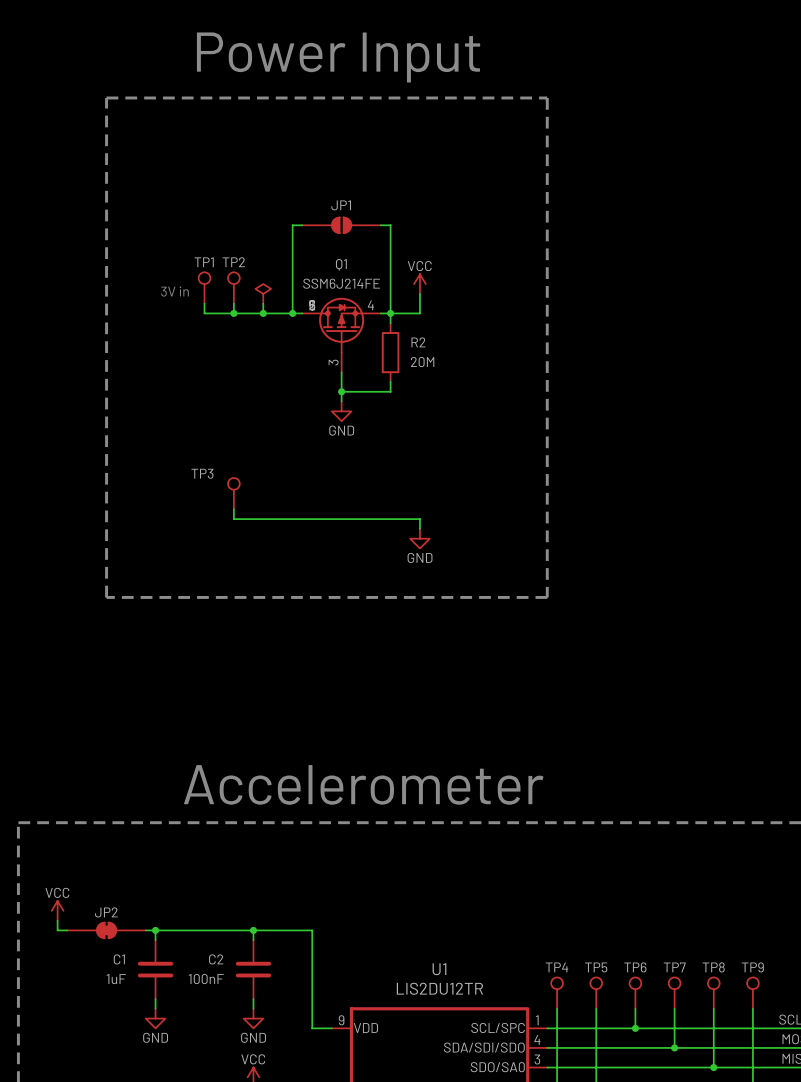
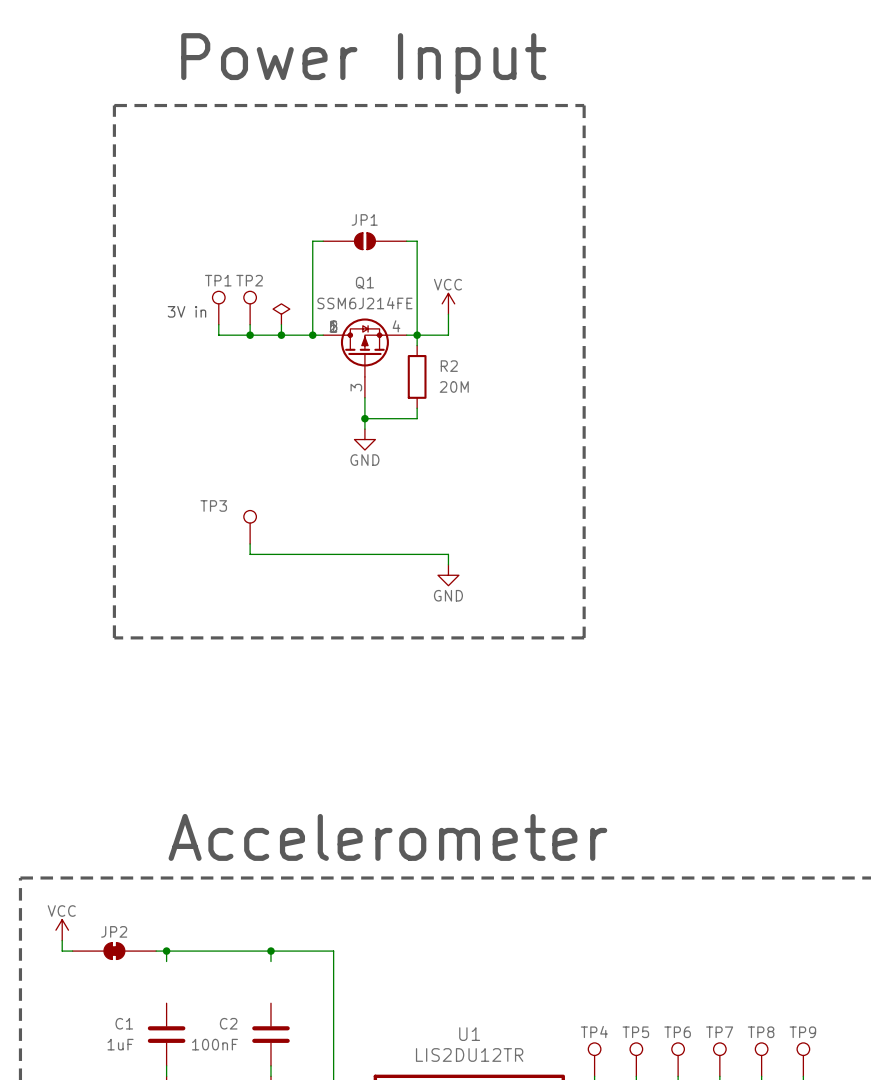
power symbol position: VCC (57, 910) -> VCC (62, 930)
wire: (57, 920) (57, 930) (67, 930) -> (62, 940) (62, 951) (72, 951)
JP2 position: (106, 930) -> (114, 951)
wire: (145, 930) (312, 930) -> (156, 951) (333, 951) (333, 992)
wire: (155, 930) (155, 940) -> (166, 951) (166, 961)
junction position: (155, 930) -> (166, 951)
wire: (253, 930) (253, 940) -> (270, 951) (270, 961)
junction position: (253, 930) -> (270, 951)

